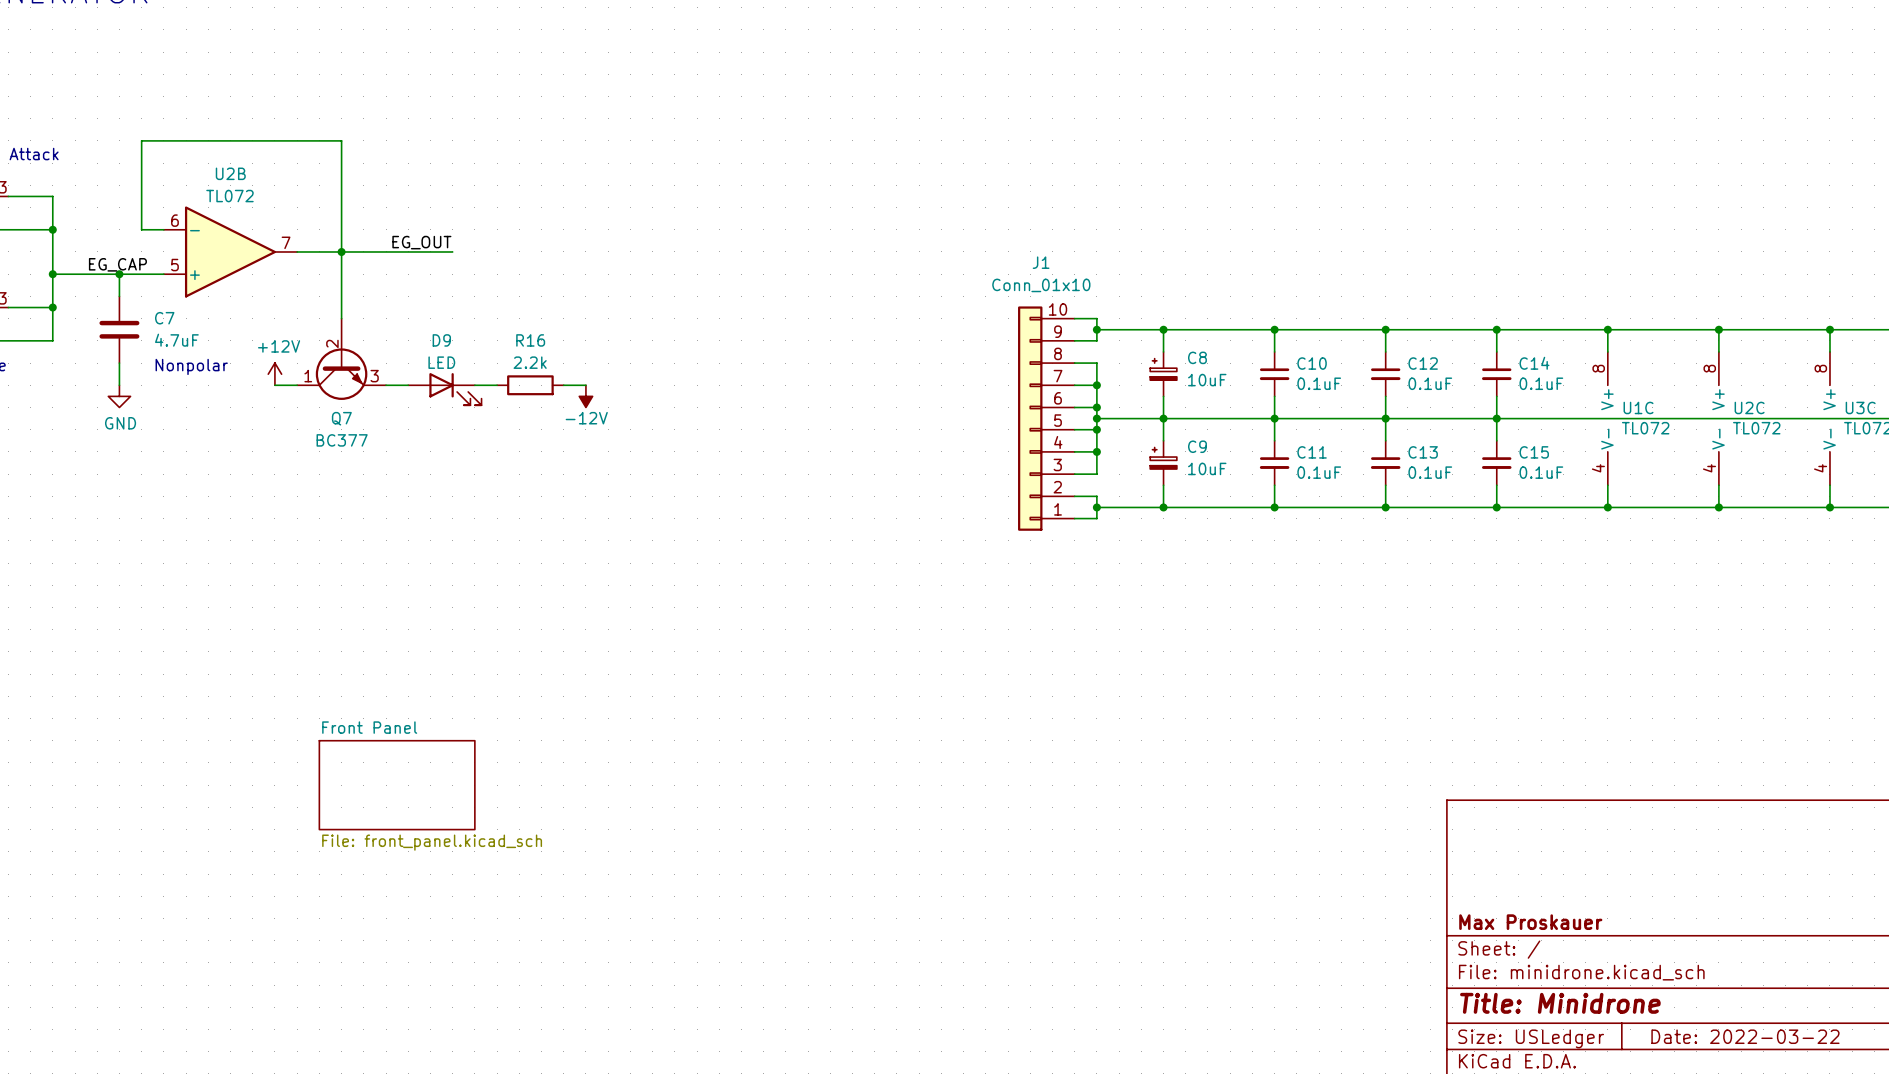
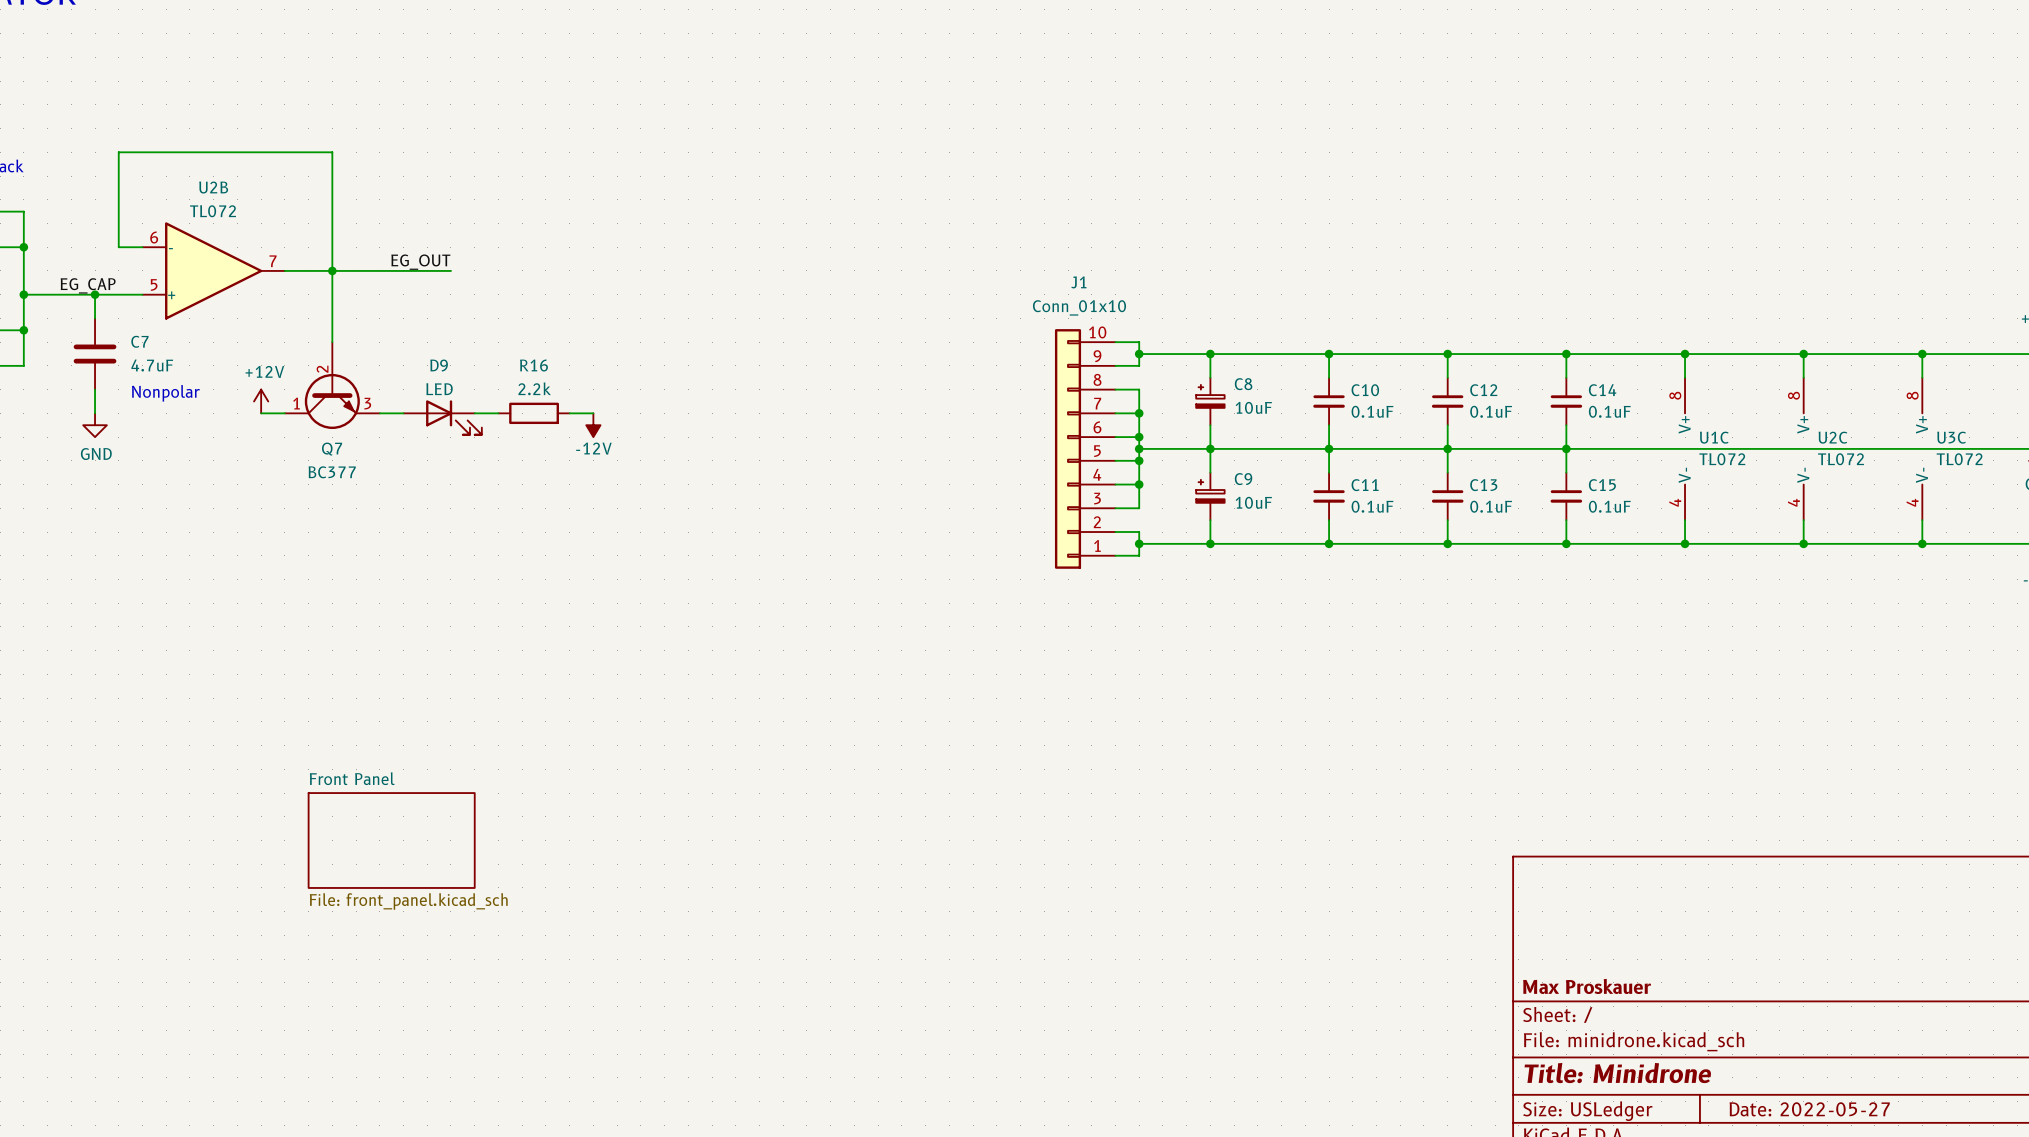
title block: Date: 2022-03-22 (1745, 1036) -> Date: 2022-05-27 (1809, 1109)

